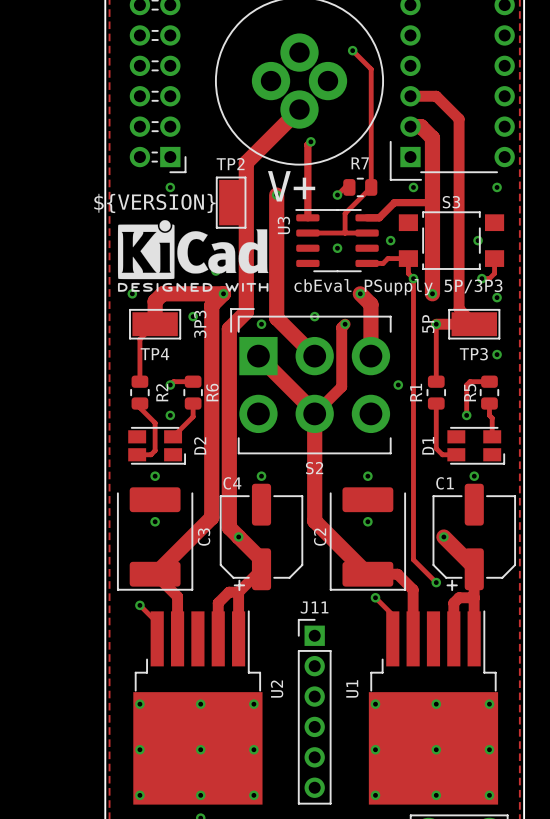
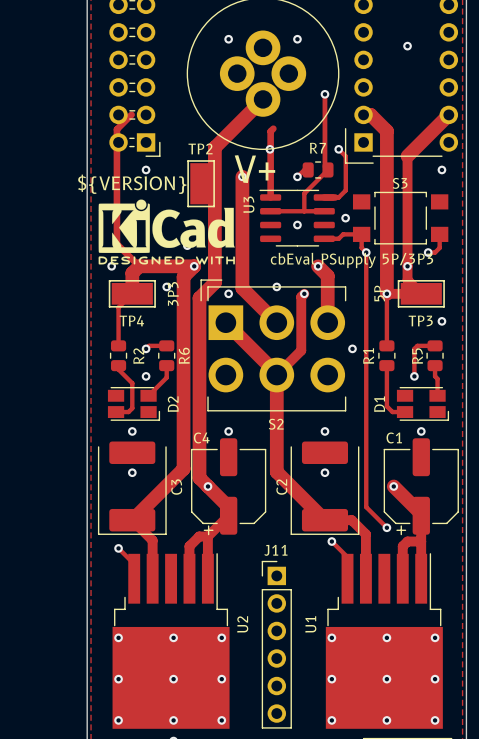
via: none -> (228, 39)
track: (352, 50) (371, 69) (371, 187) -> (324, 94) (324, 166) (327, 169)
via position: (352, 50) -> (297, 39)
via: none -> (407, 46)
track: (410, 96) (436, 96) (459, 119) (459, 172) -> (448, 114) (407, 156)
via: none -> (324, 94)
track: none -> (131, 114) (116, 129) (116, 244) (139, 266)
track: (418, 126) (421, 126) (432, 138) (432, 293) -> (370, 114) (386, 131) (386, 293)
via position: (310, 141) -> (269, 149)
via: none -> (338, 149)
via: (413, 187) -> none
track: (432, 202) (394, 202) (379, 217) -> (338, 149) (345, 156) (345, 190) (338, 197) (335, 197)
via: (478, 240) -> none
via: (432, 293) -> none
via: none -> (407, 266)
via: (497, 297) -> none

